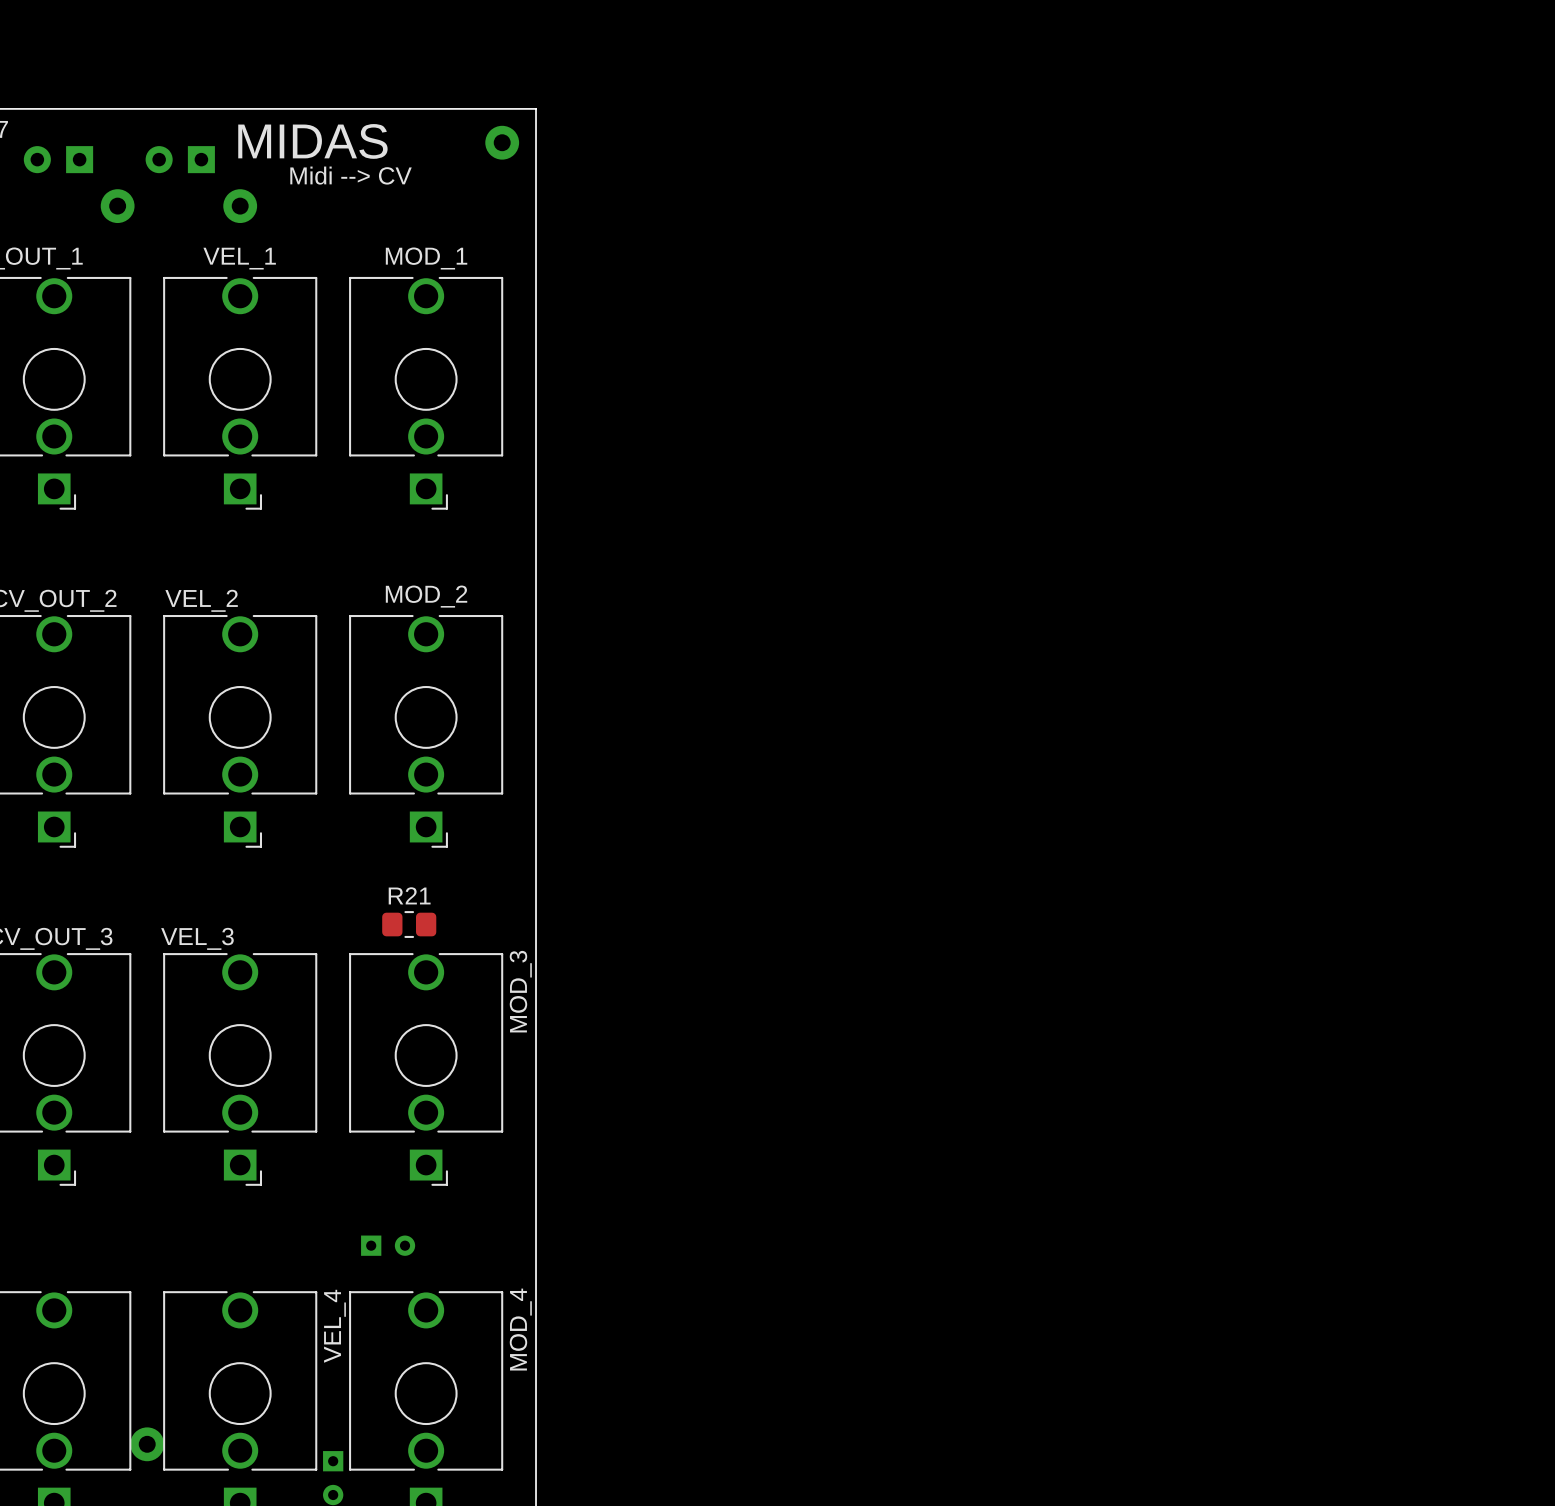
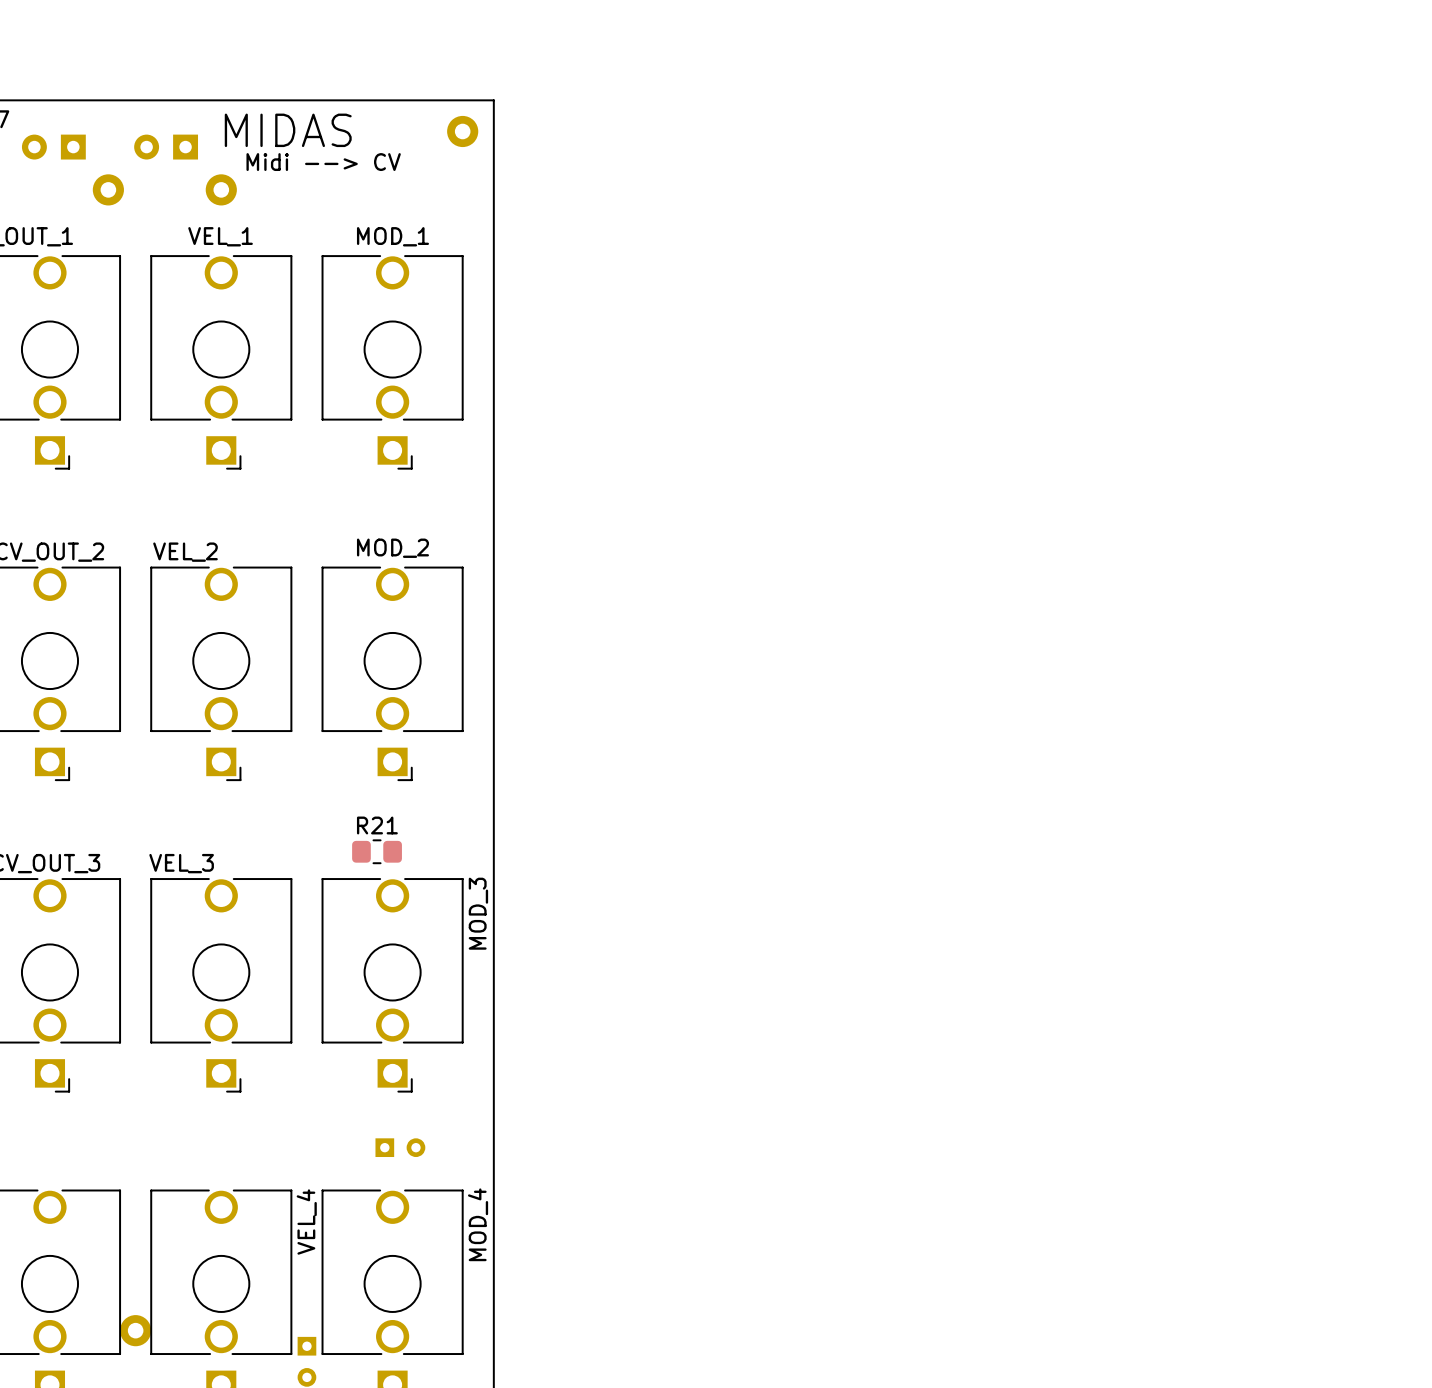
part position: (388, 1245) -> (400, 1147)

